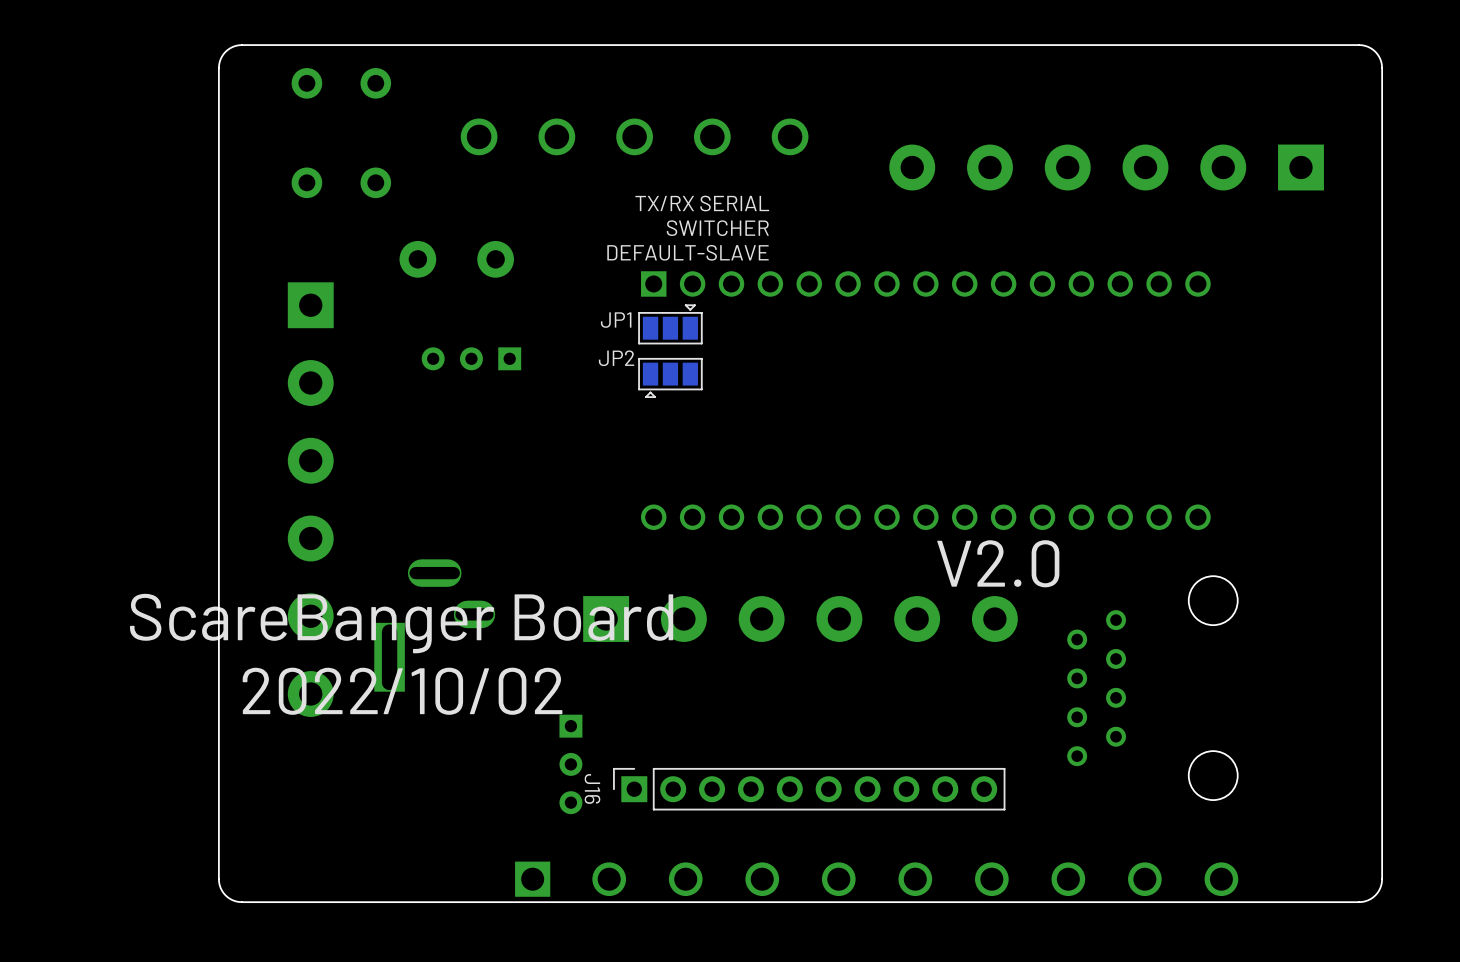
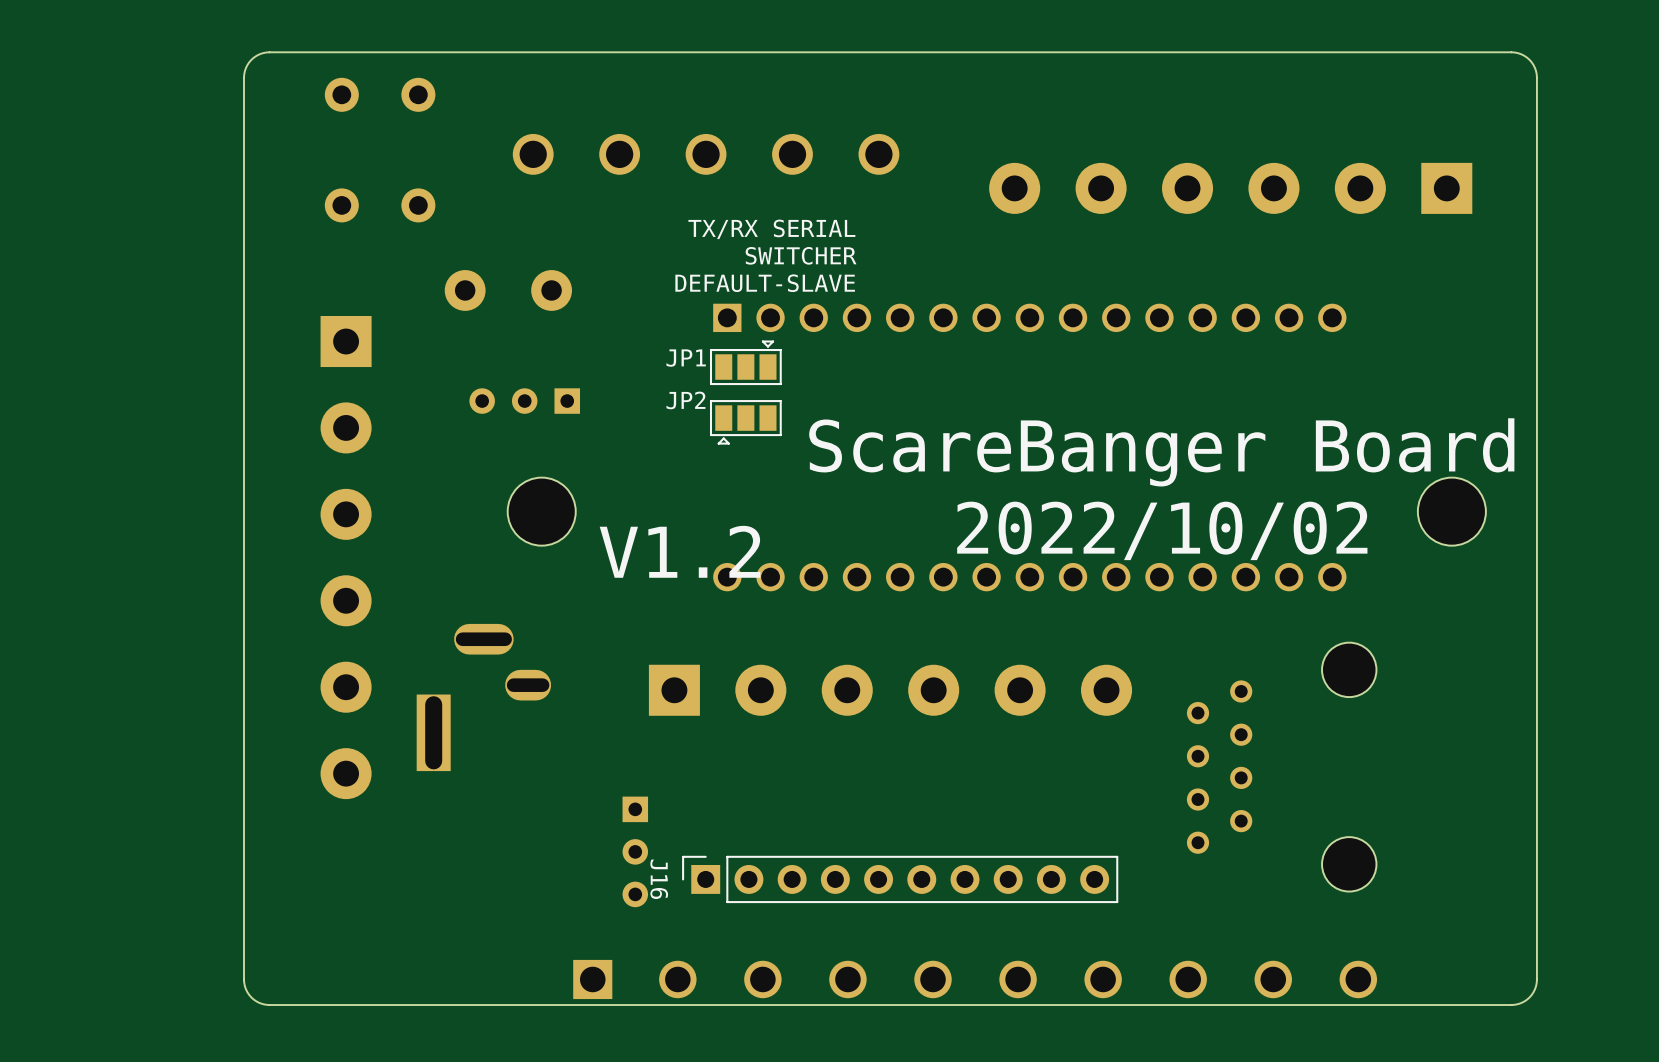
text: none -> ScareBanger Board (1161, 452)
part: none -> (541, 511)
part: none -> (1451, 511)
text: none -> 2022/10/02 (1162, 530)
text: none -> V1.2 (680, 551)
text: V2.0 (998, 563) -> none
text: ScareBanger Board (401, 623) -> none
text: 2022/10/02 (402, 691) -> none

